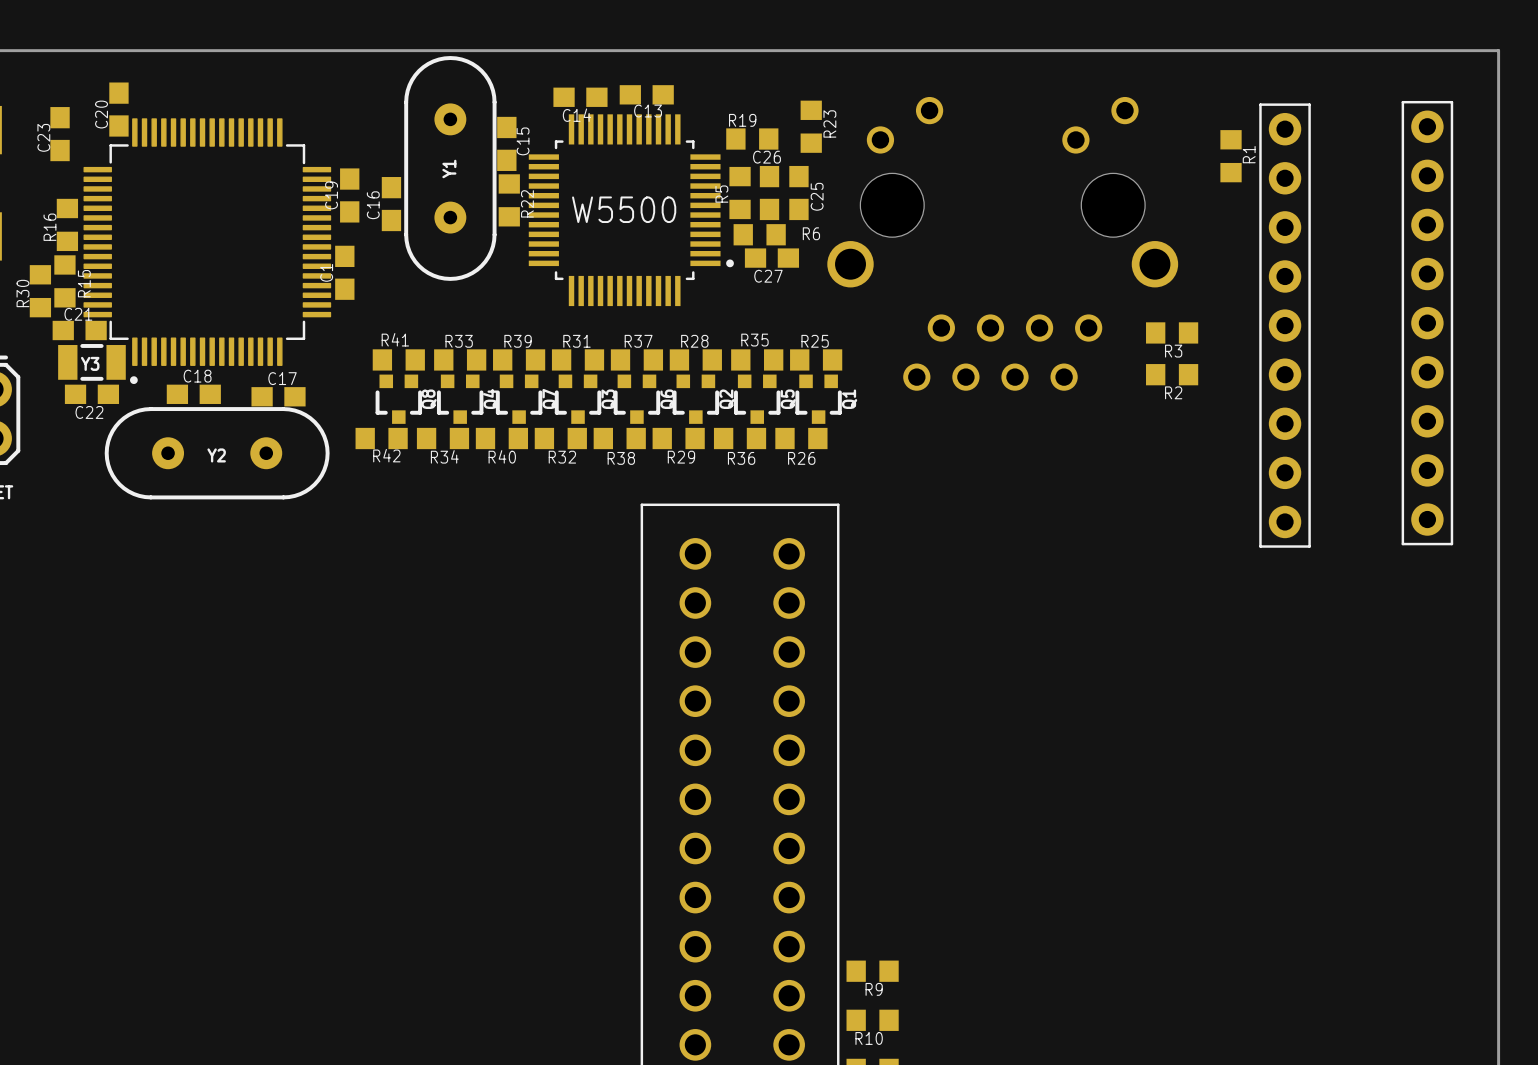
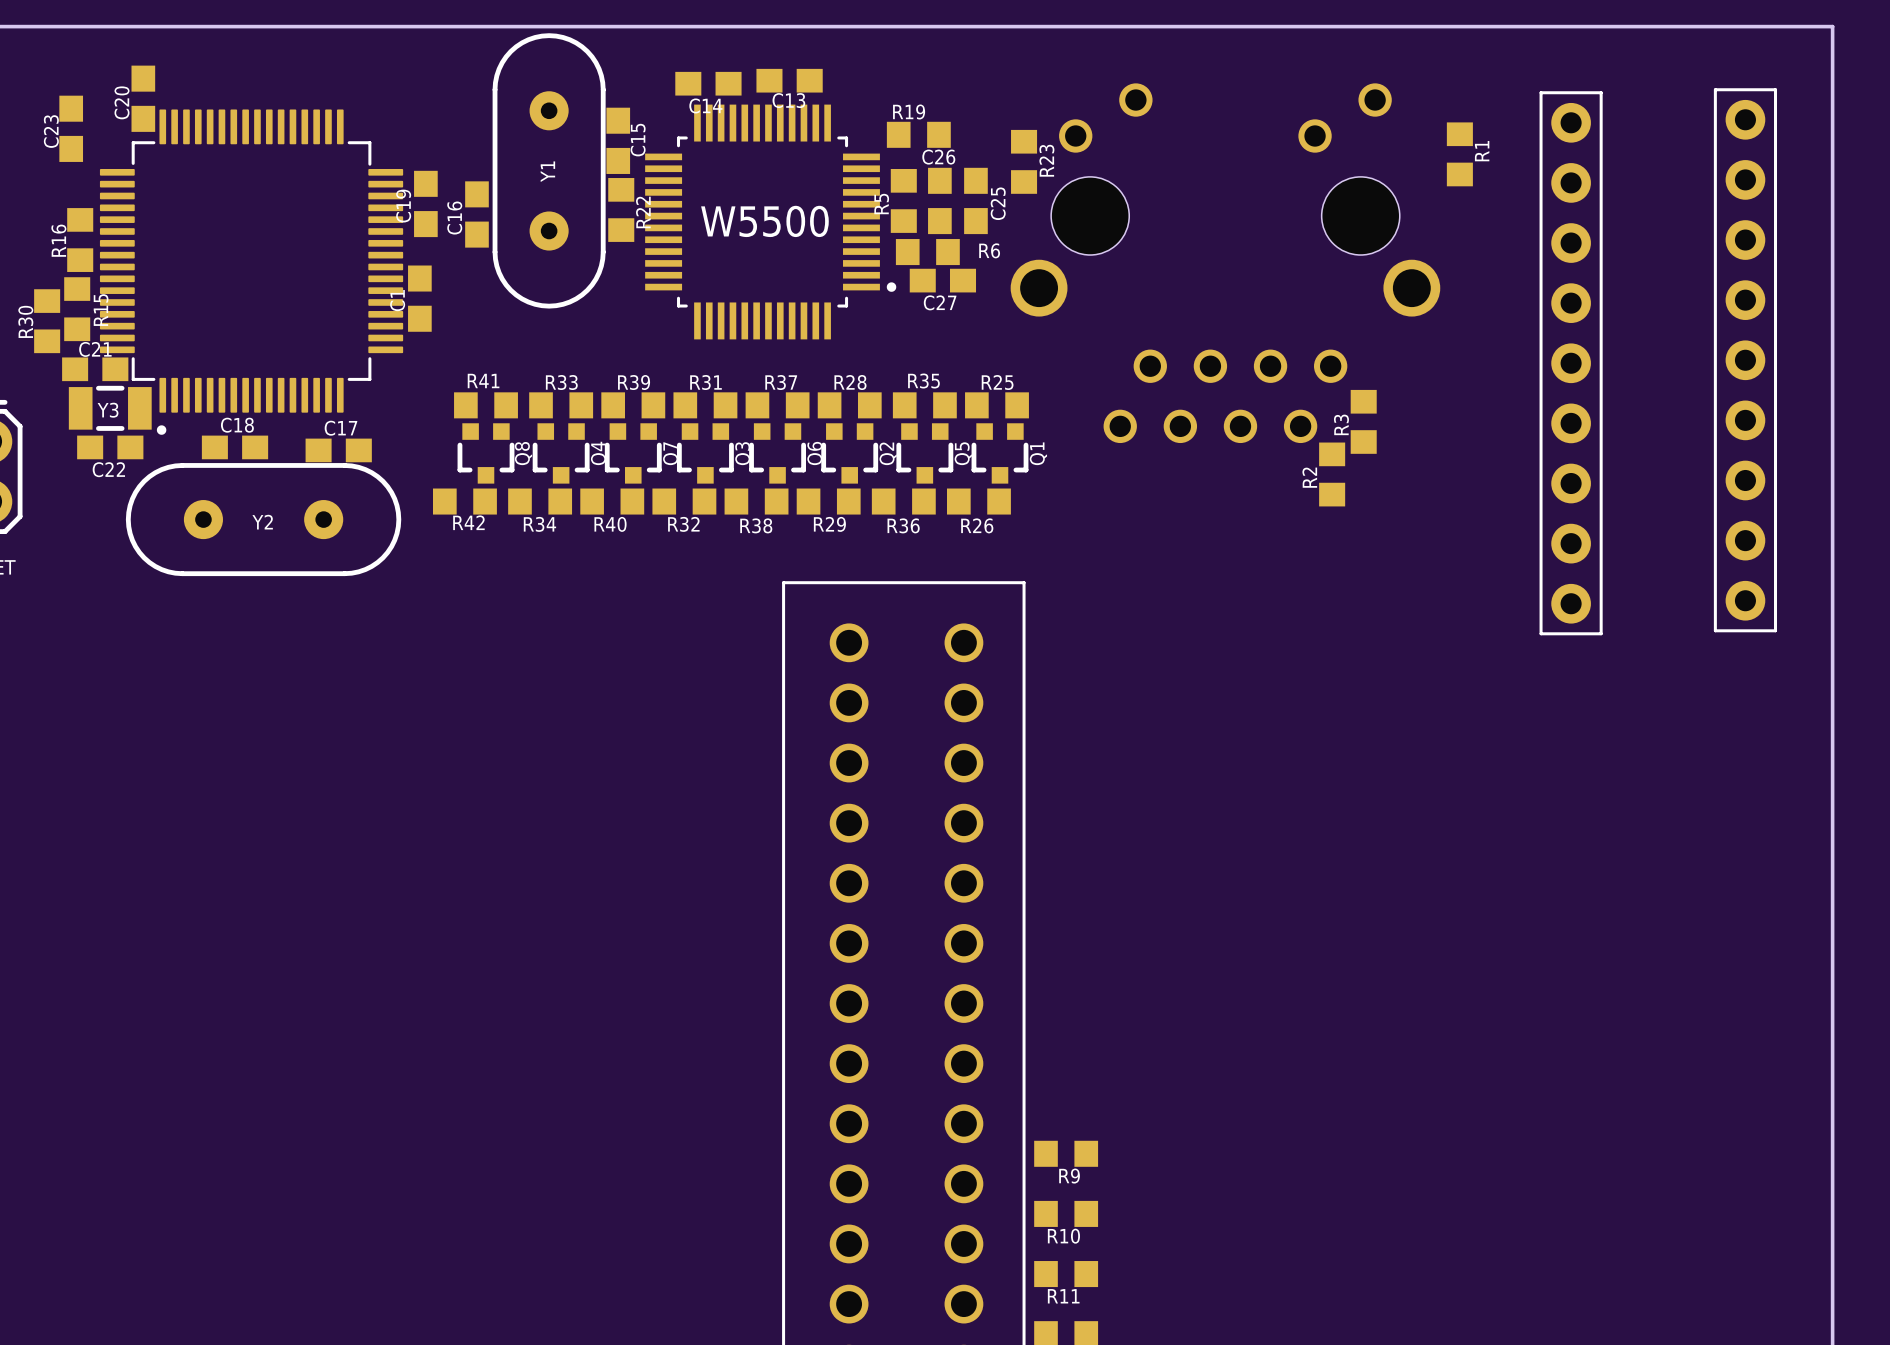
R23 position: (811, 126) -> (1024, 161)
R1 position: (1231, 156) -> (1459, 154)
R3 rotation: 0° (1172, 332) -> 90° clockwise (1363, 421)
R3 position: (1172, 332) -> (1363, 421)
R2 rotation: 0° (1172, 374) -> 90° clockwise (1332, 474)
R2 position: (1172, 374) -> (1332, 474)

